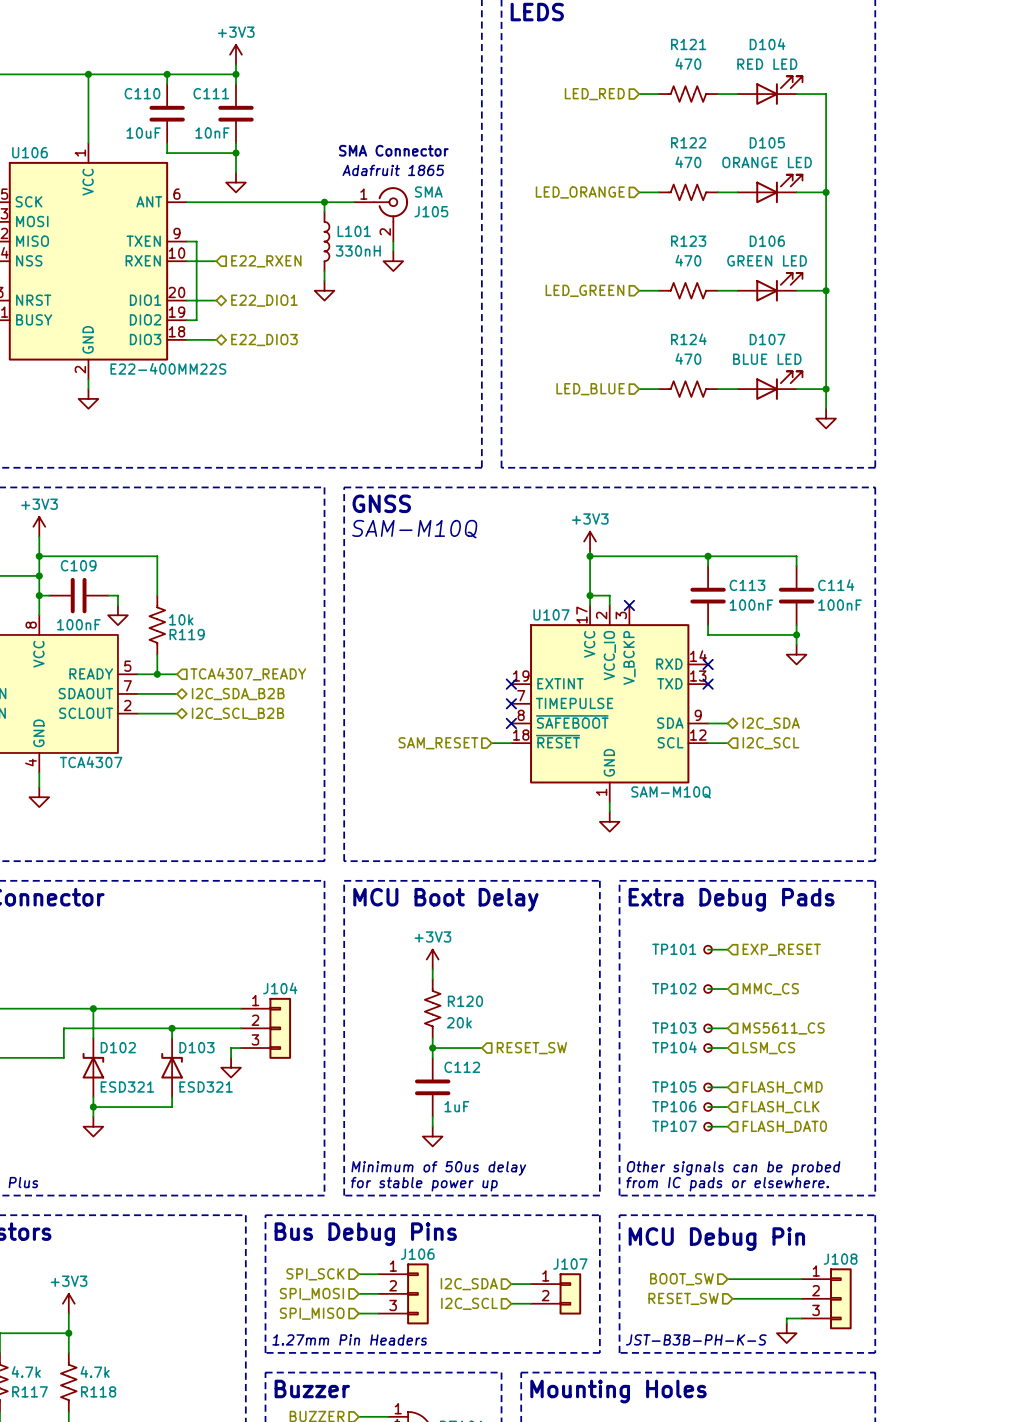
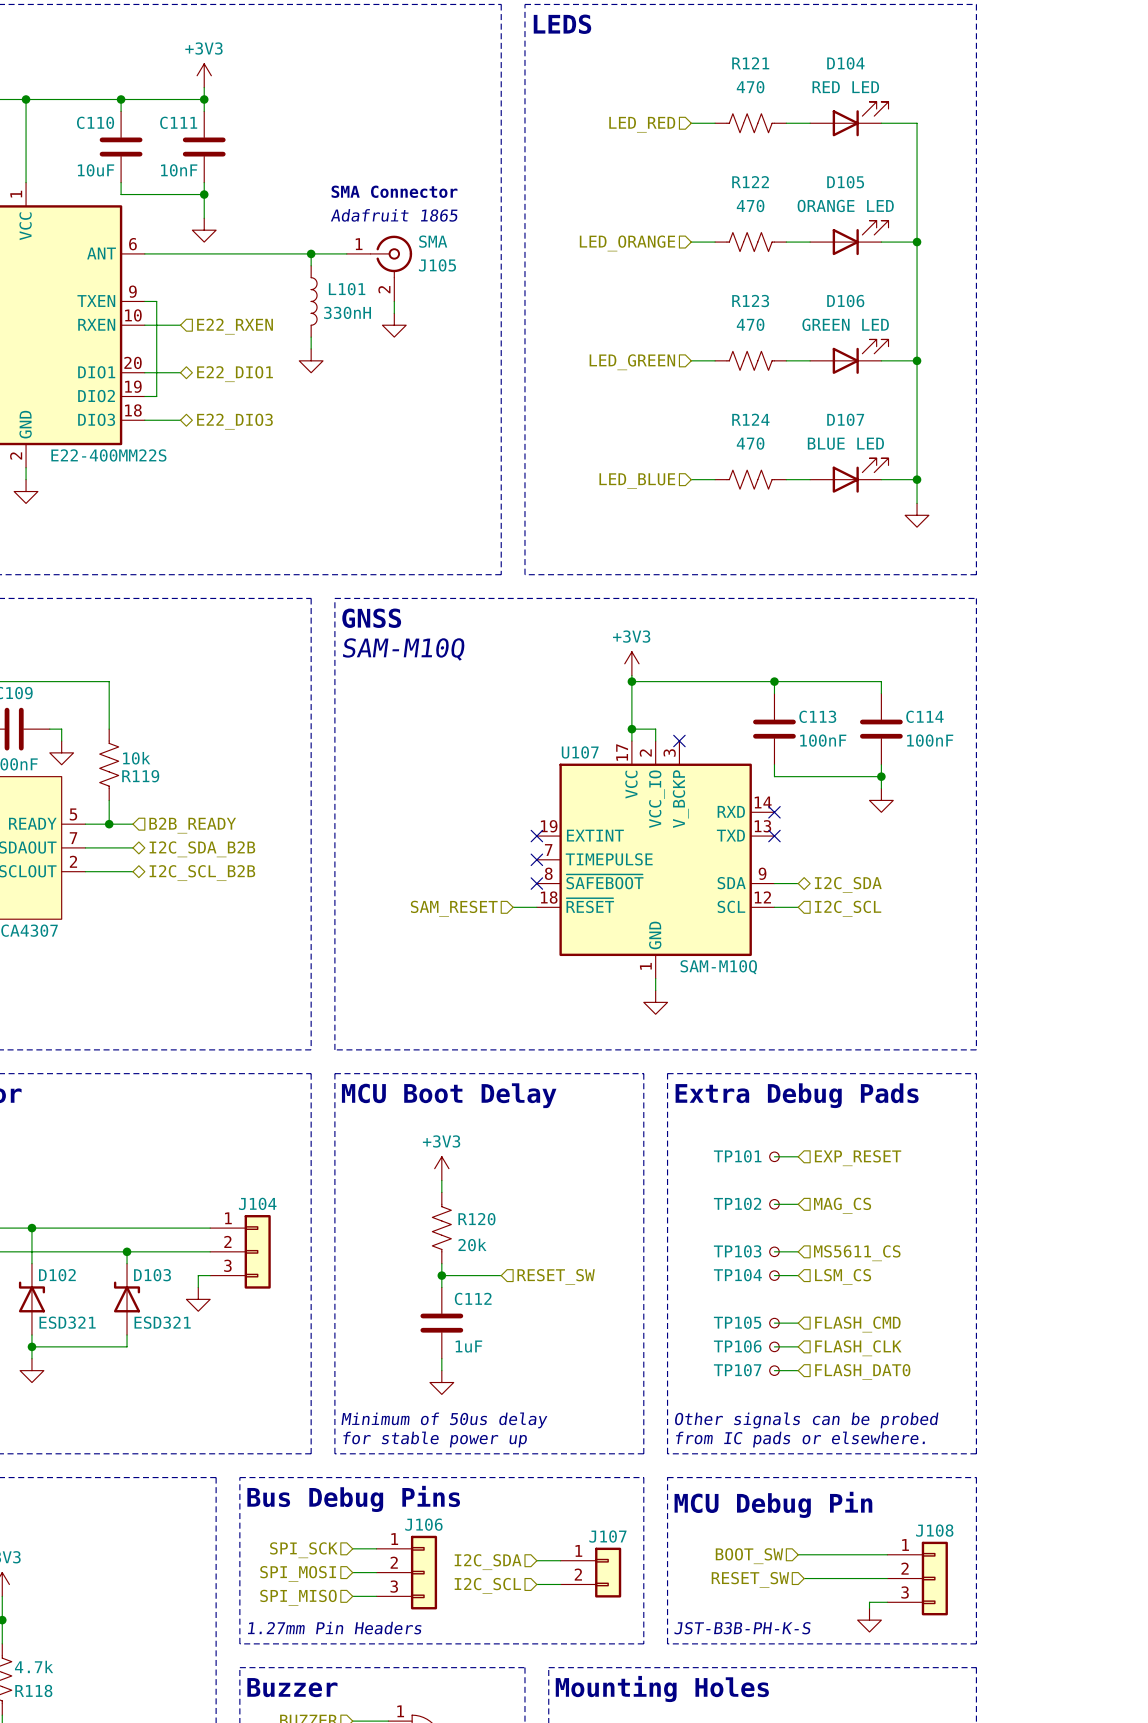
hierarchical label: TCA4307_READY (248, 674) -> B2B_READY (192, 825)
hierarchical label: MMC_CS (770, 989) -> MAG_CS (842, 1205)

